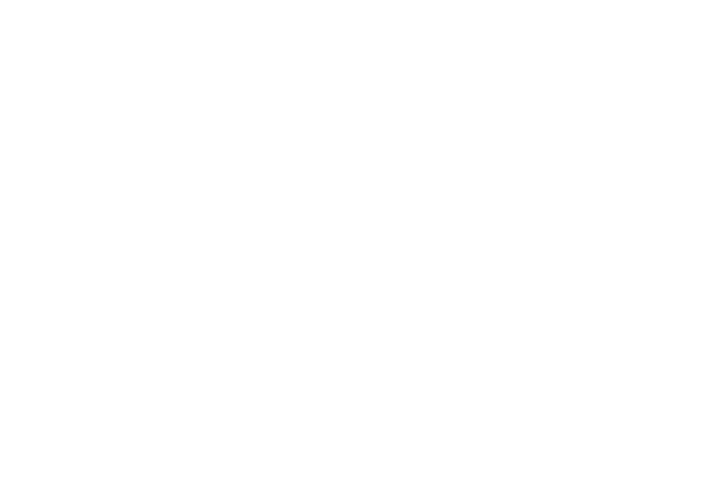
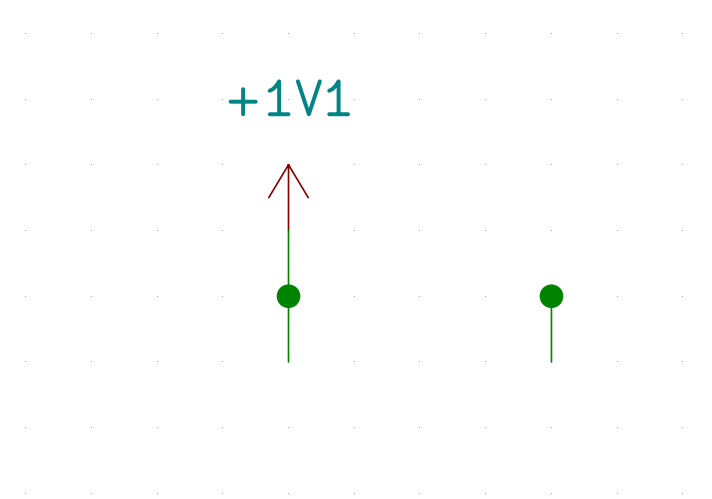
power symbol: none -> +1V1 (288, 197)
wire: none -> (288, 230) (288, 361)
junction: none -> (288, 296)
wire: none -> (551, 296) (551, 361)
junction: none -> (551, 296)

